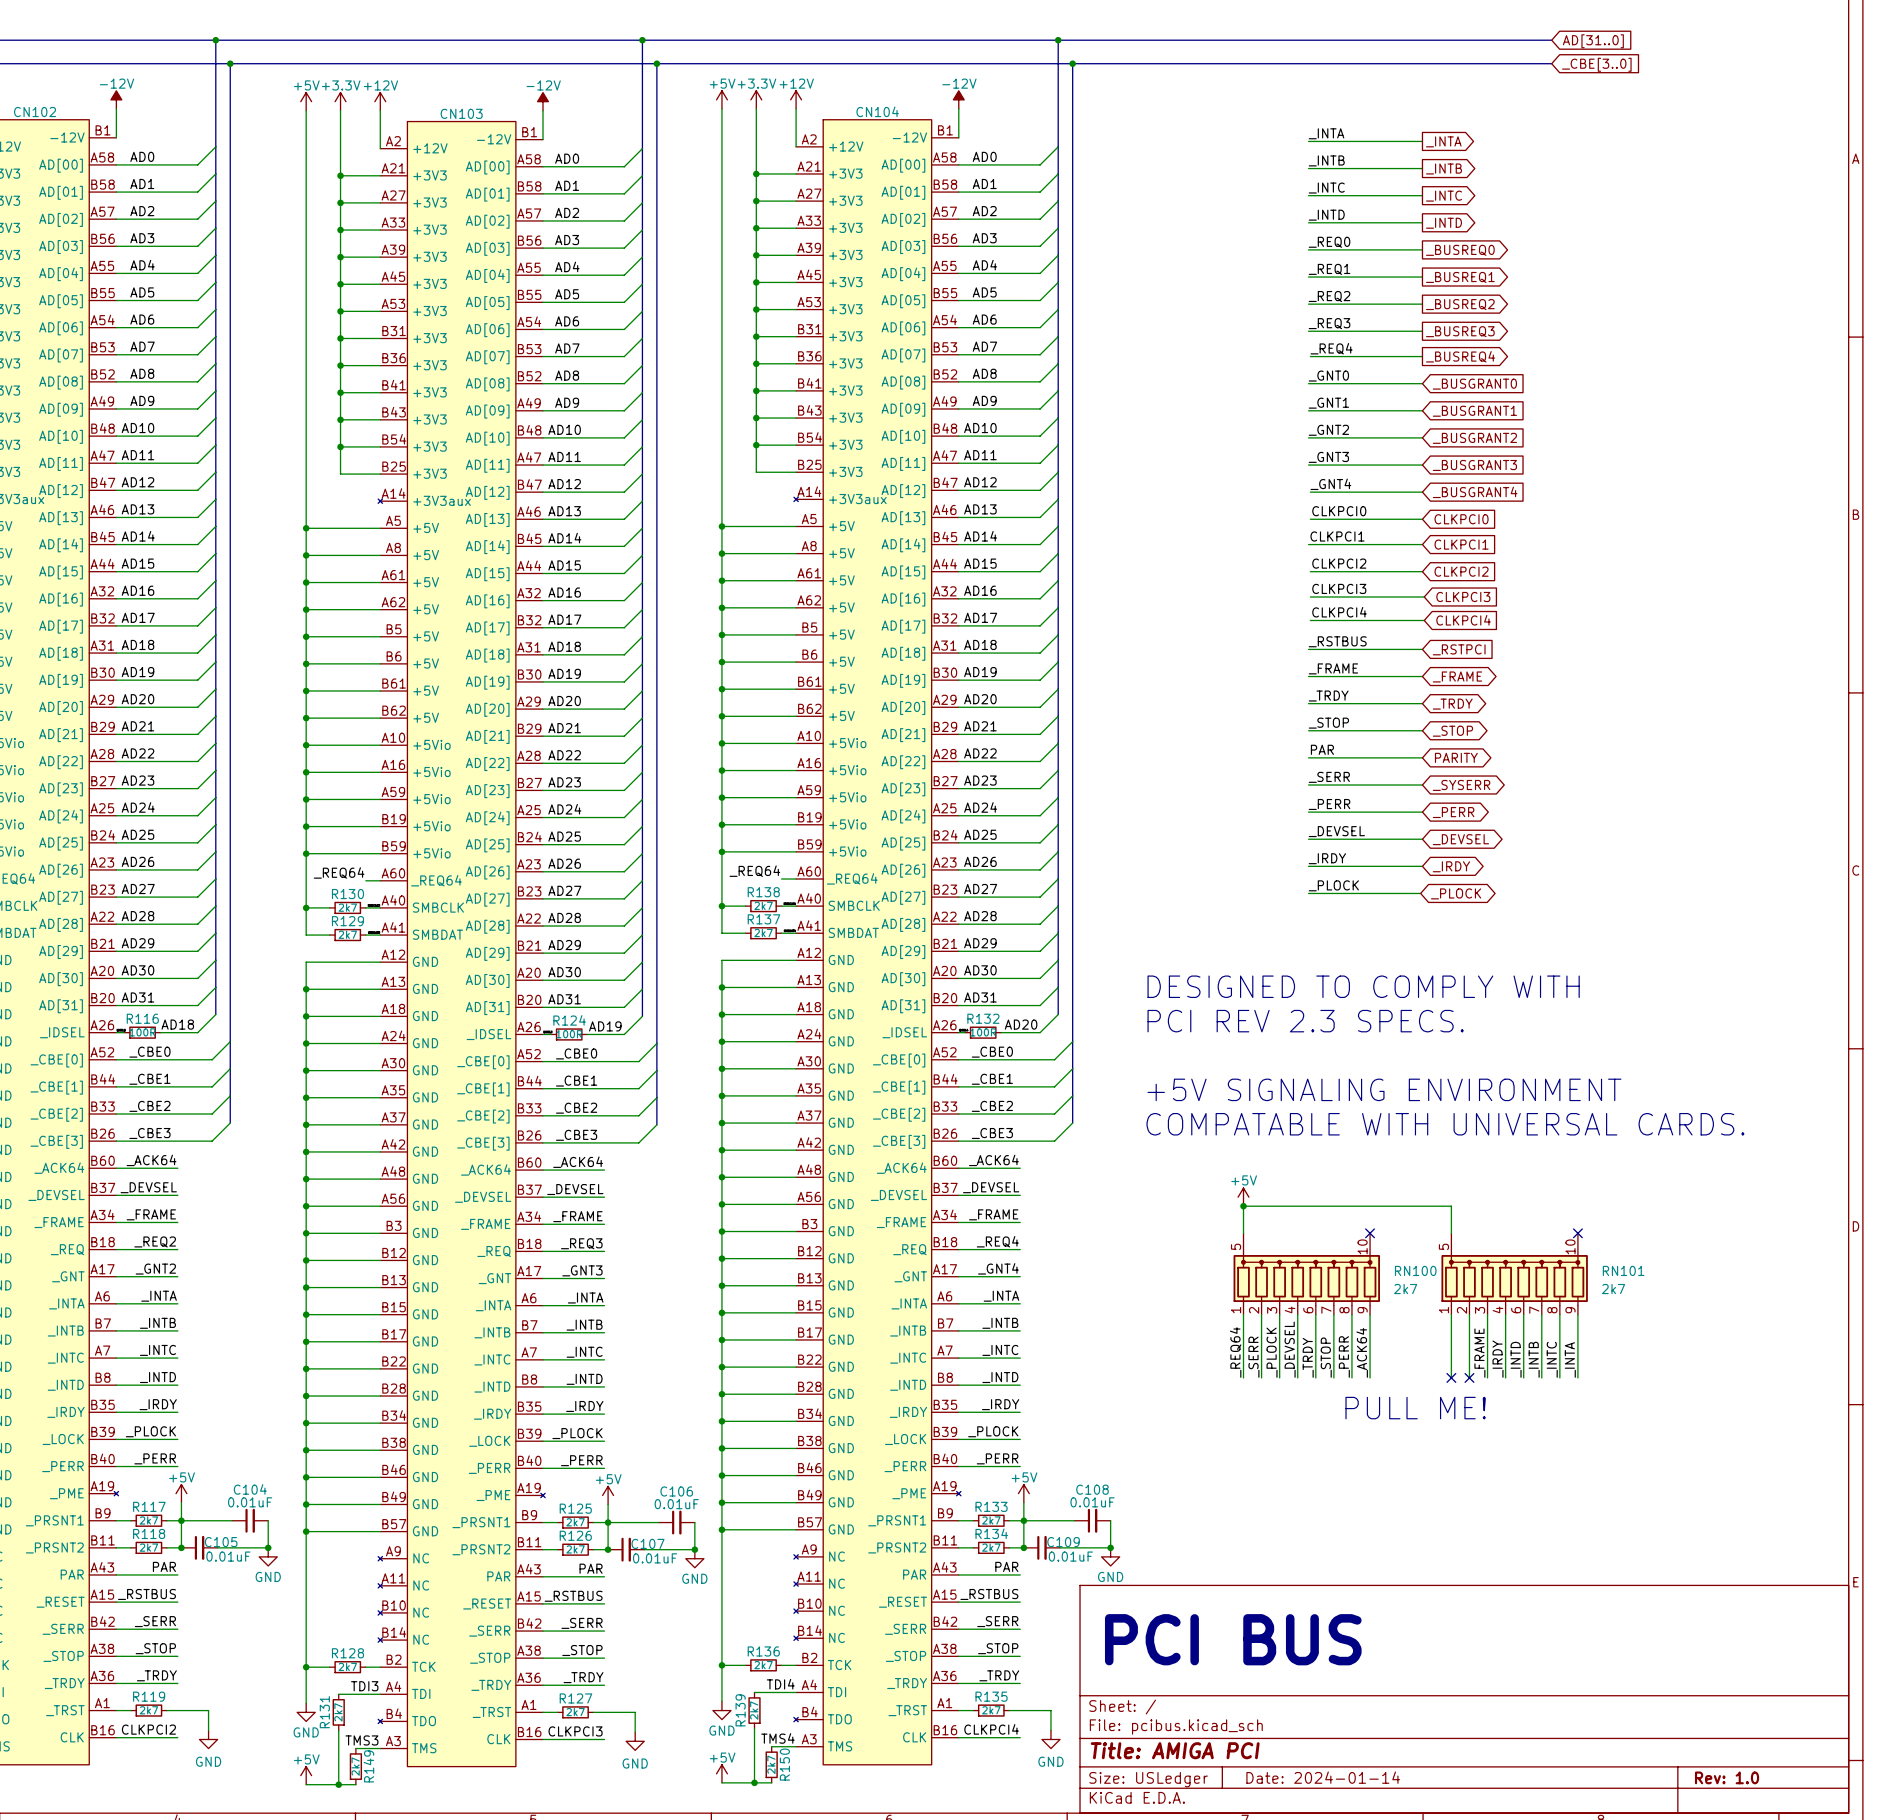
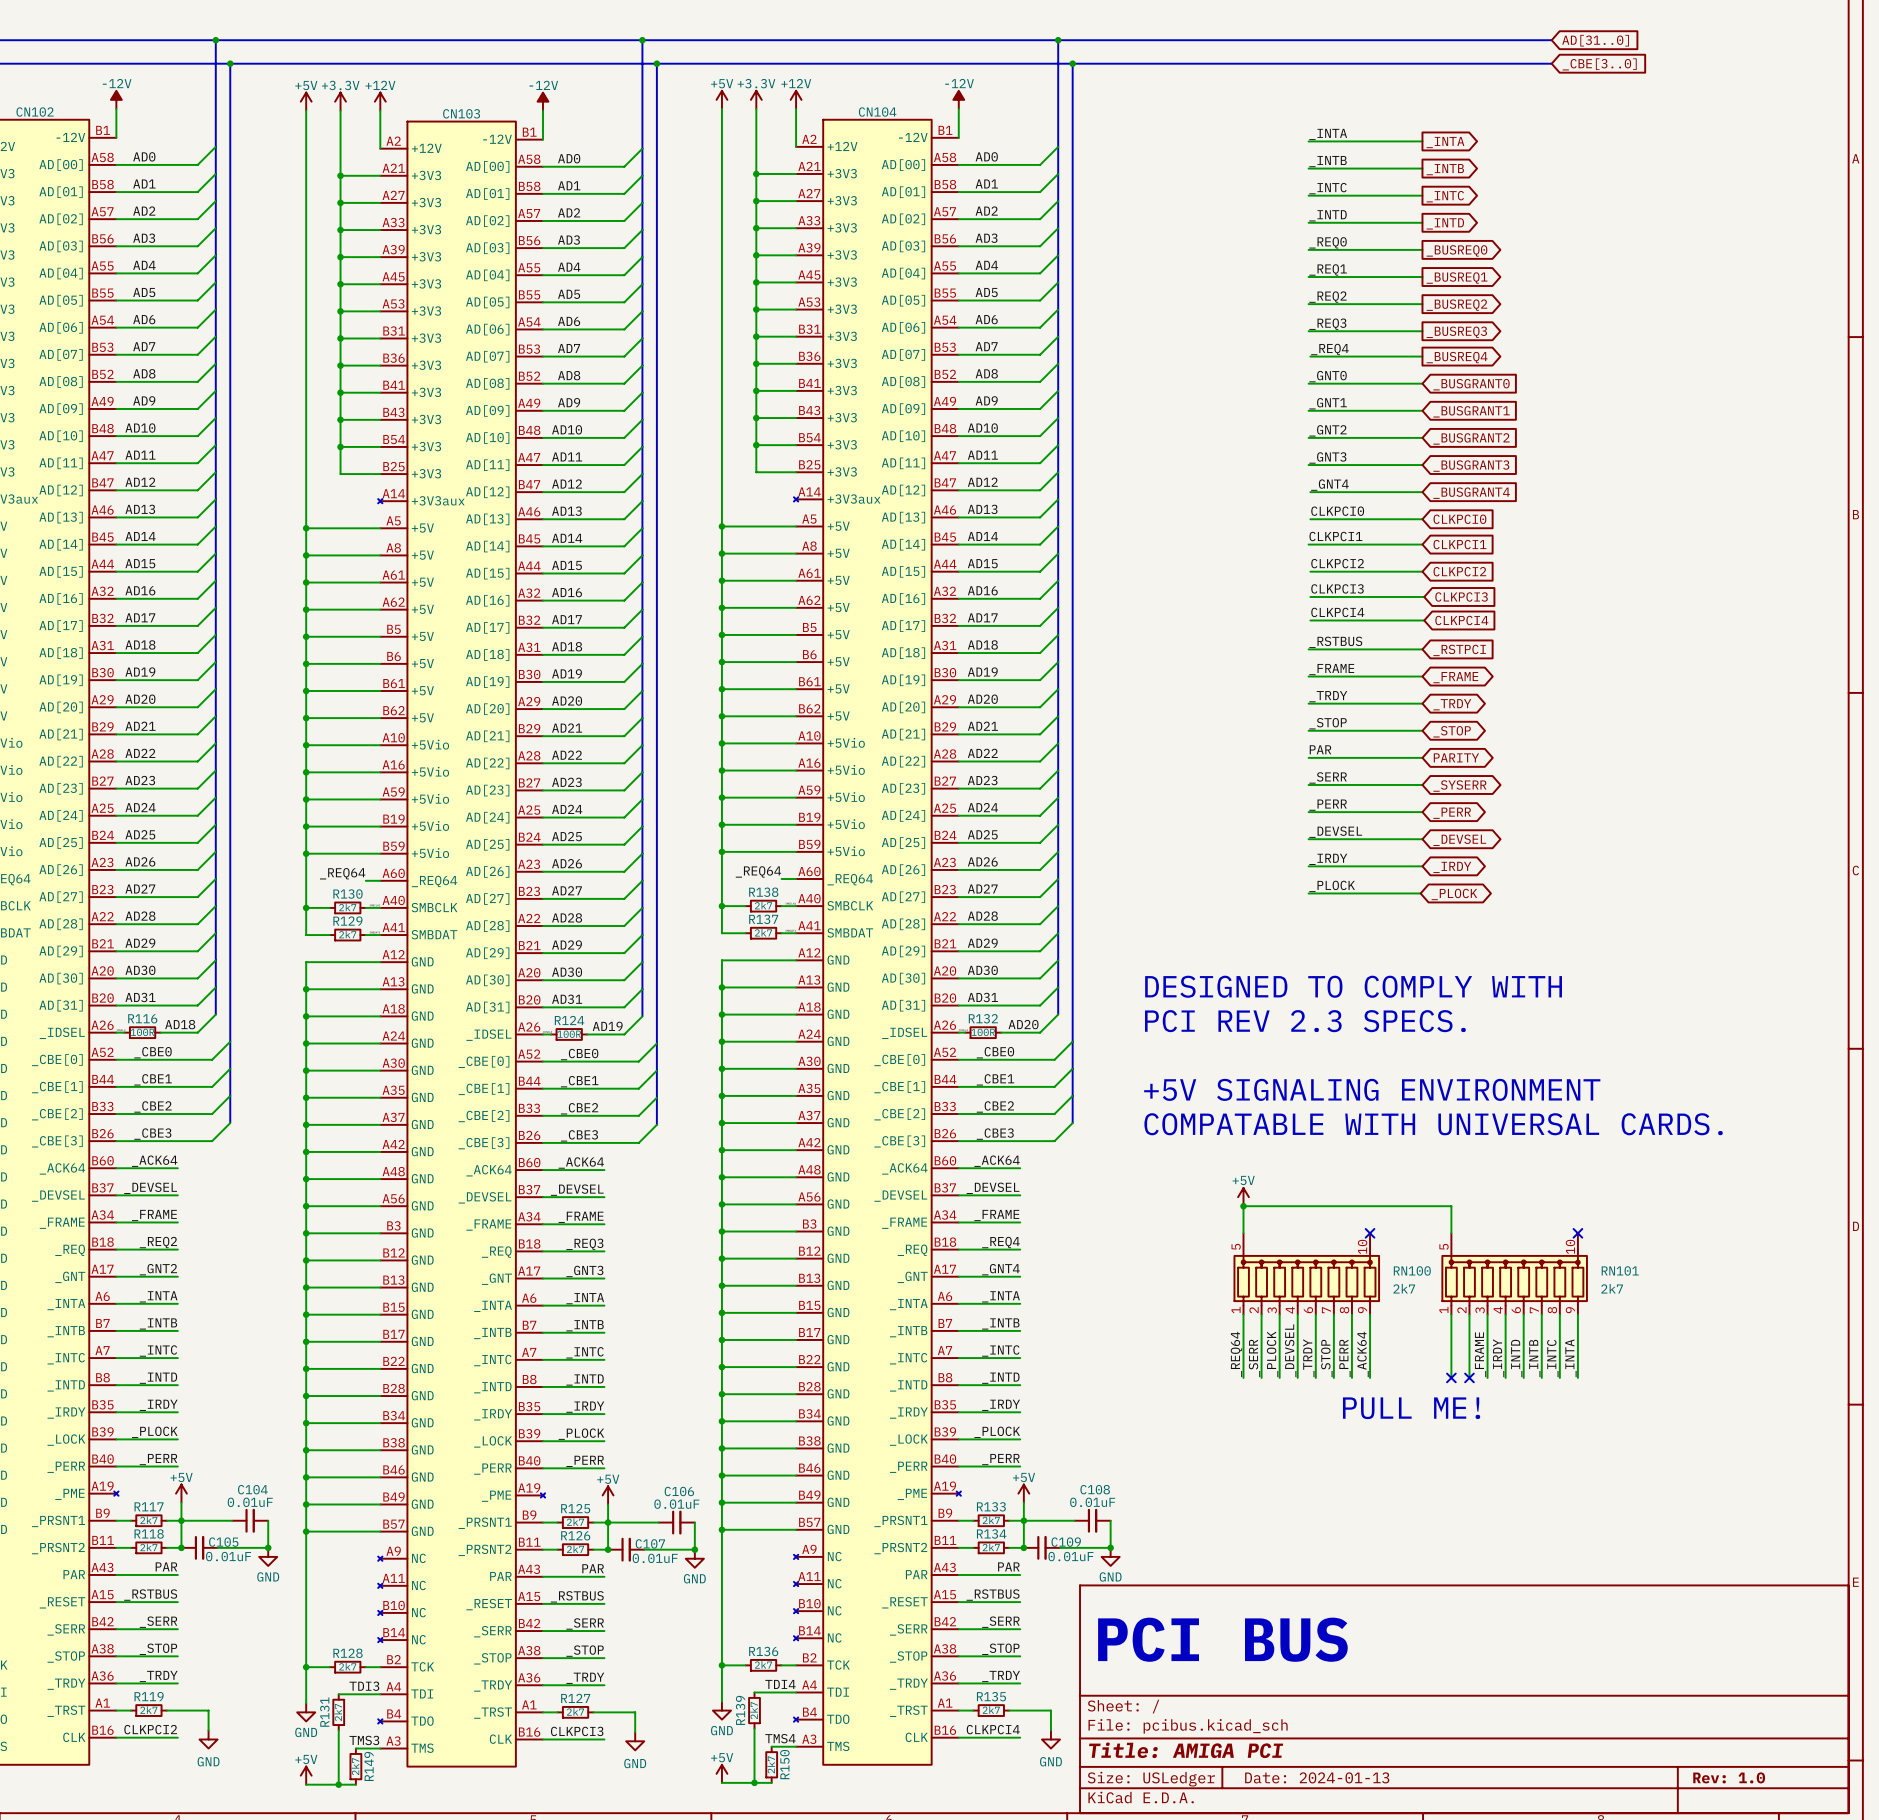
title block: Date: 2024-01-14 (1323, 1777) -> Date: 2024-01-13 (1317, 1777)

